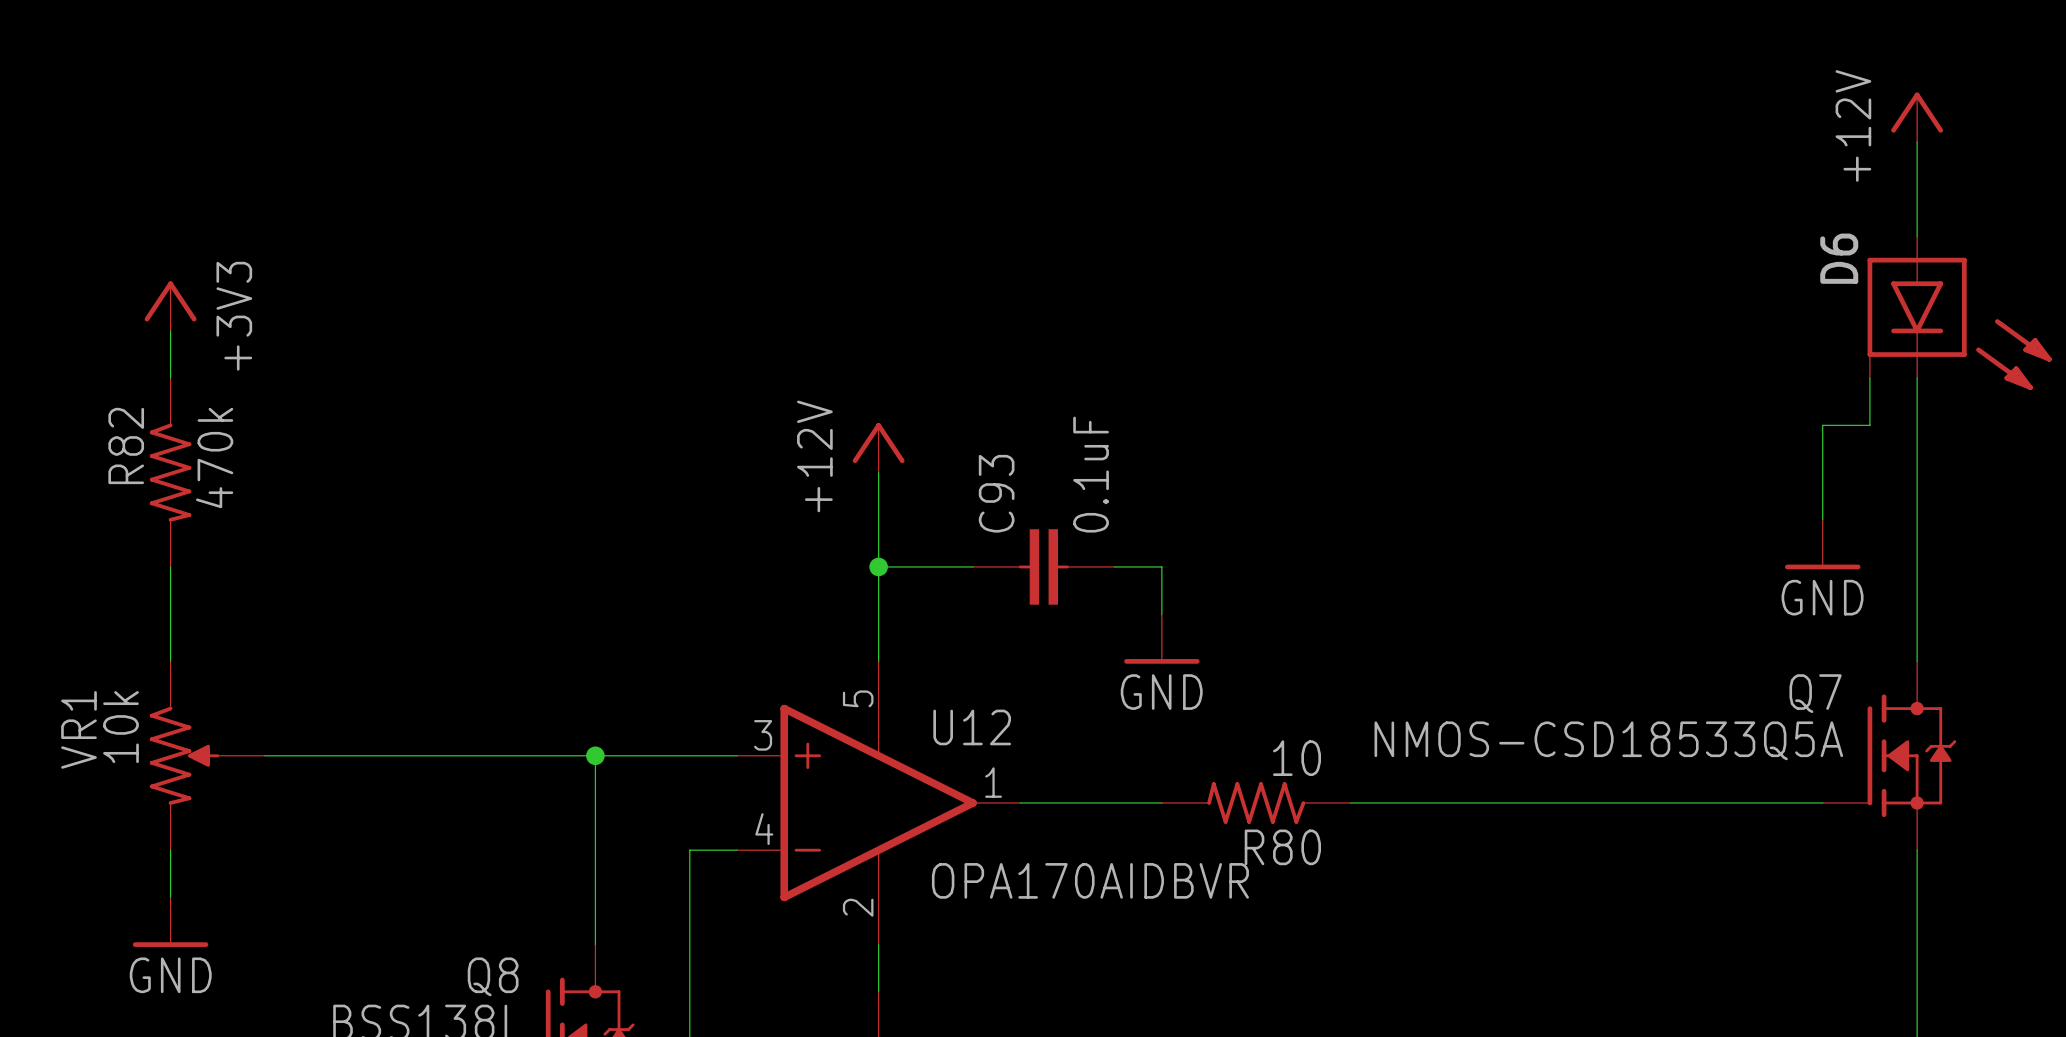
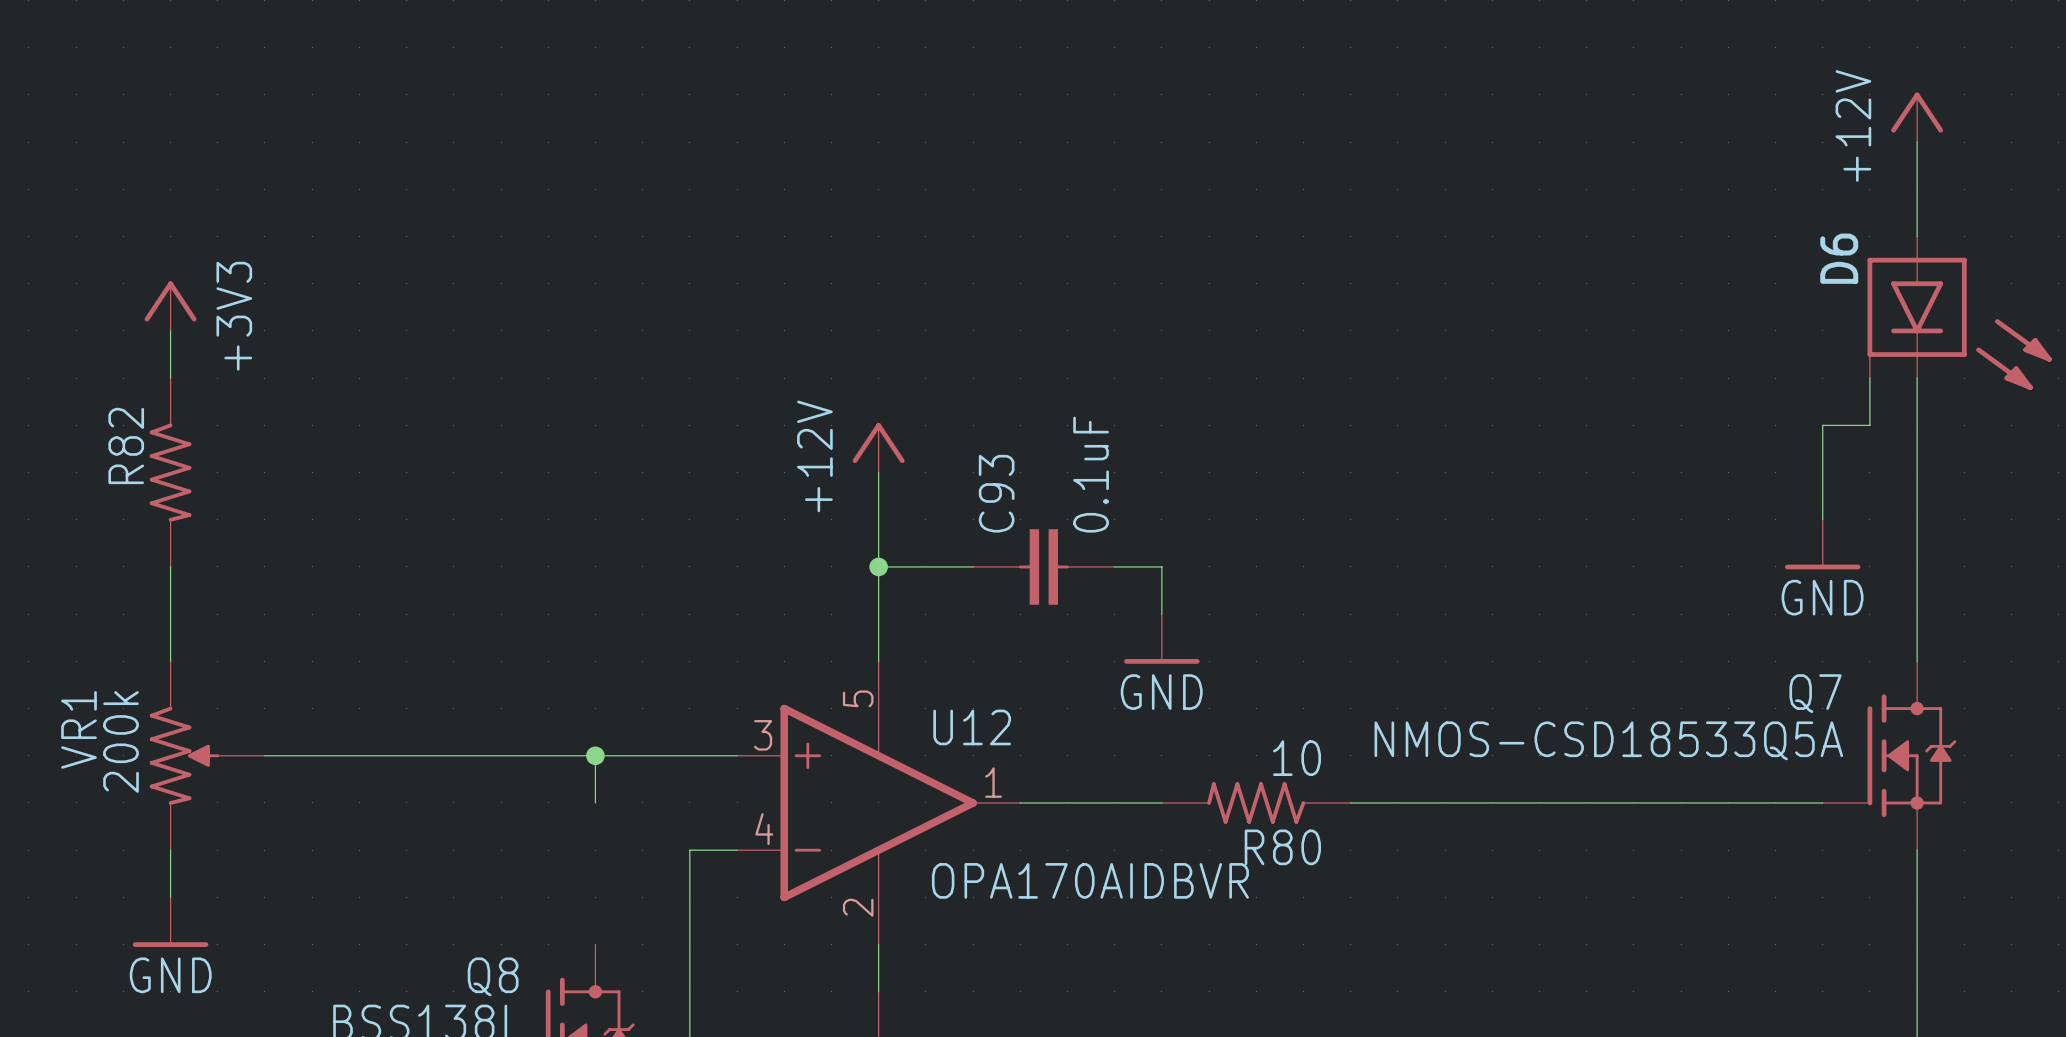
R82 value: 470k (214, 458) -> none
VR1 value: 10k (121, 727) -> 200k (121, 741)
wire: (595, 802) (595, 944) -> none

